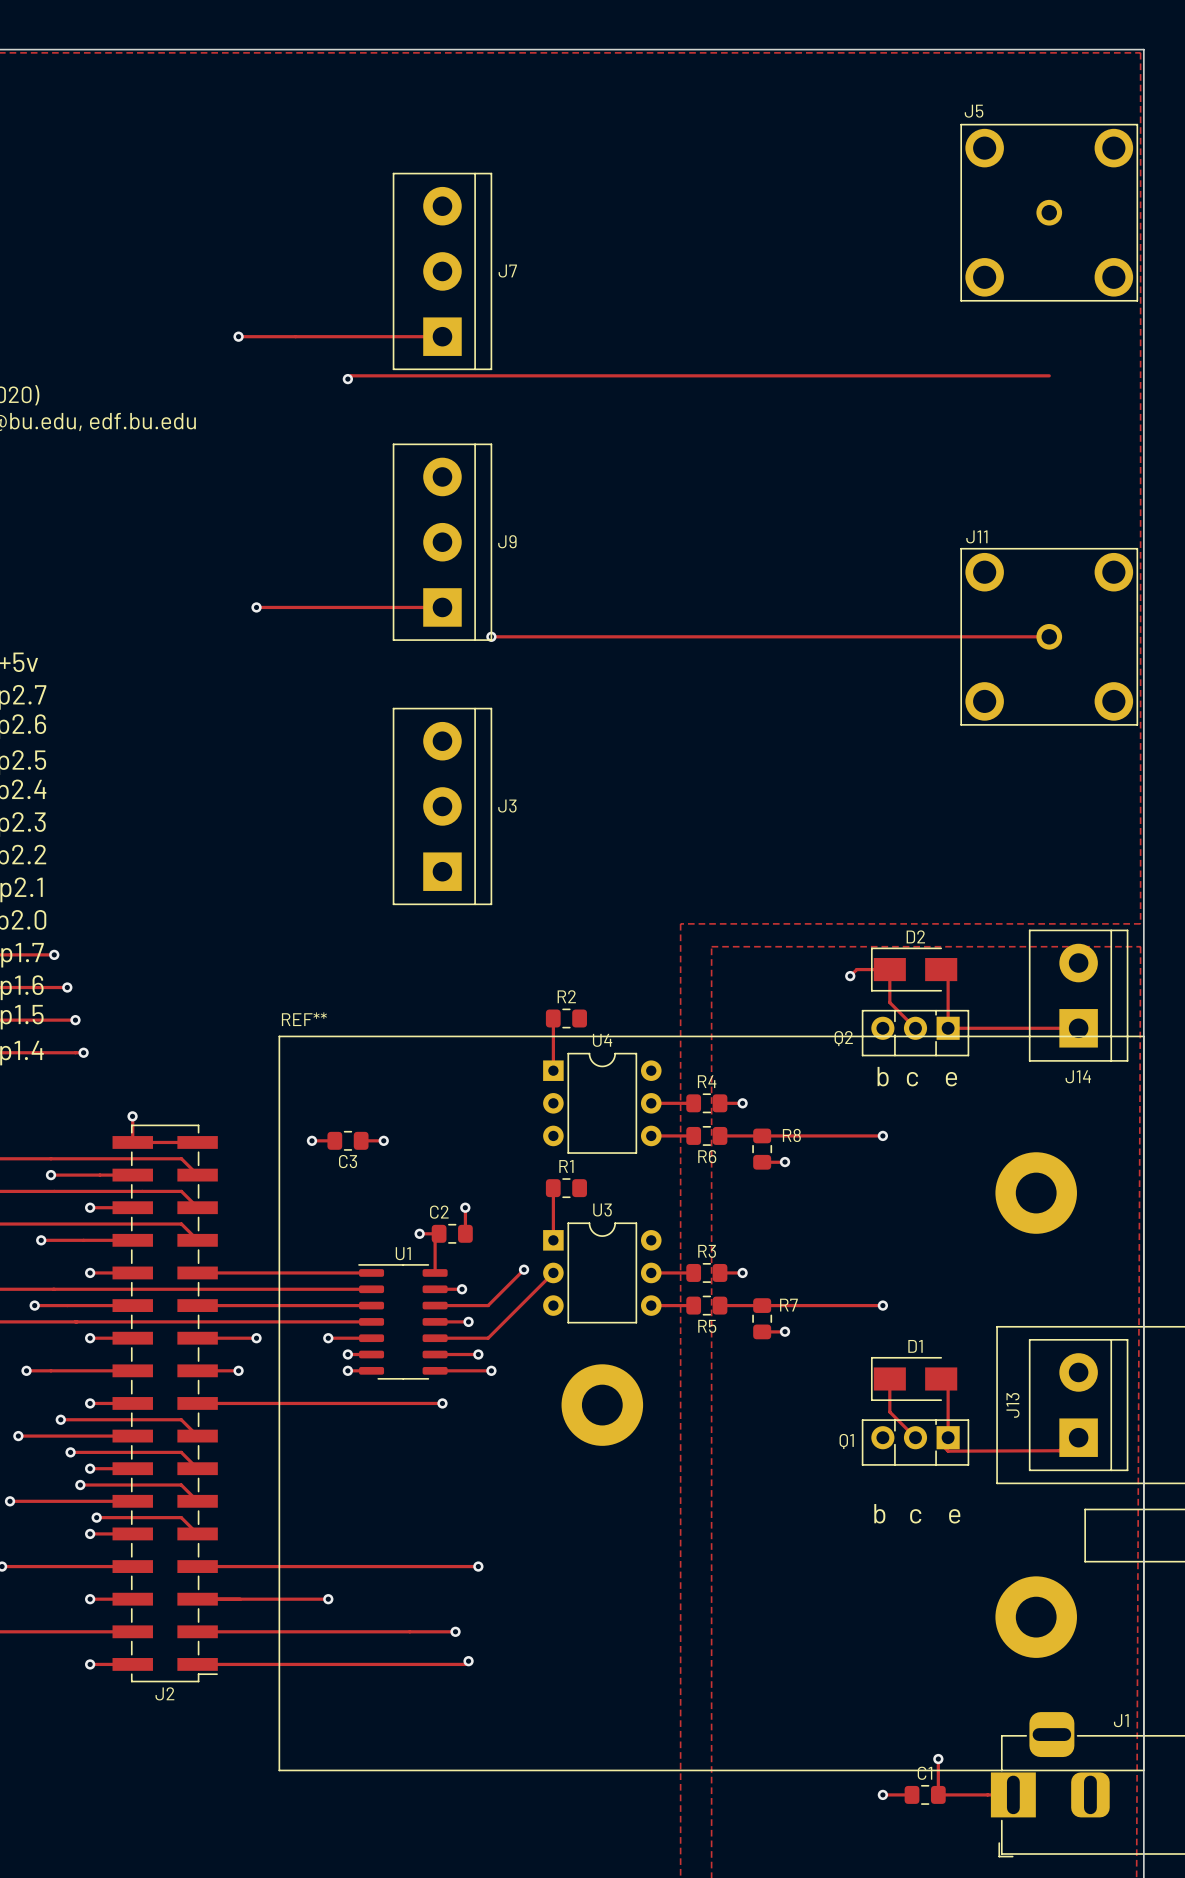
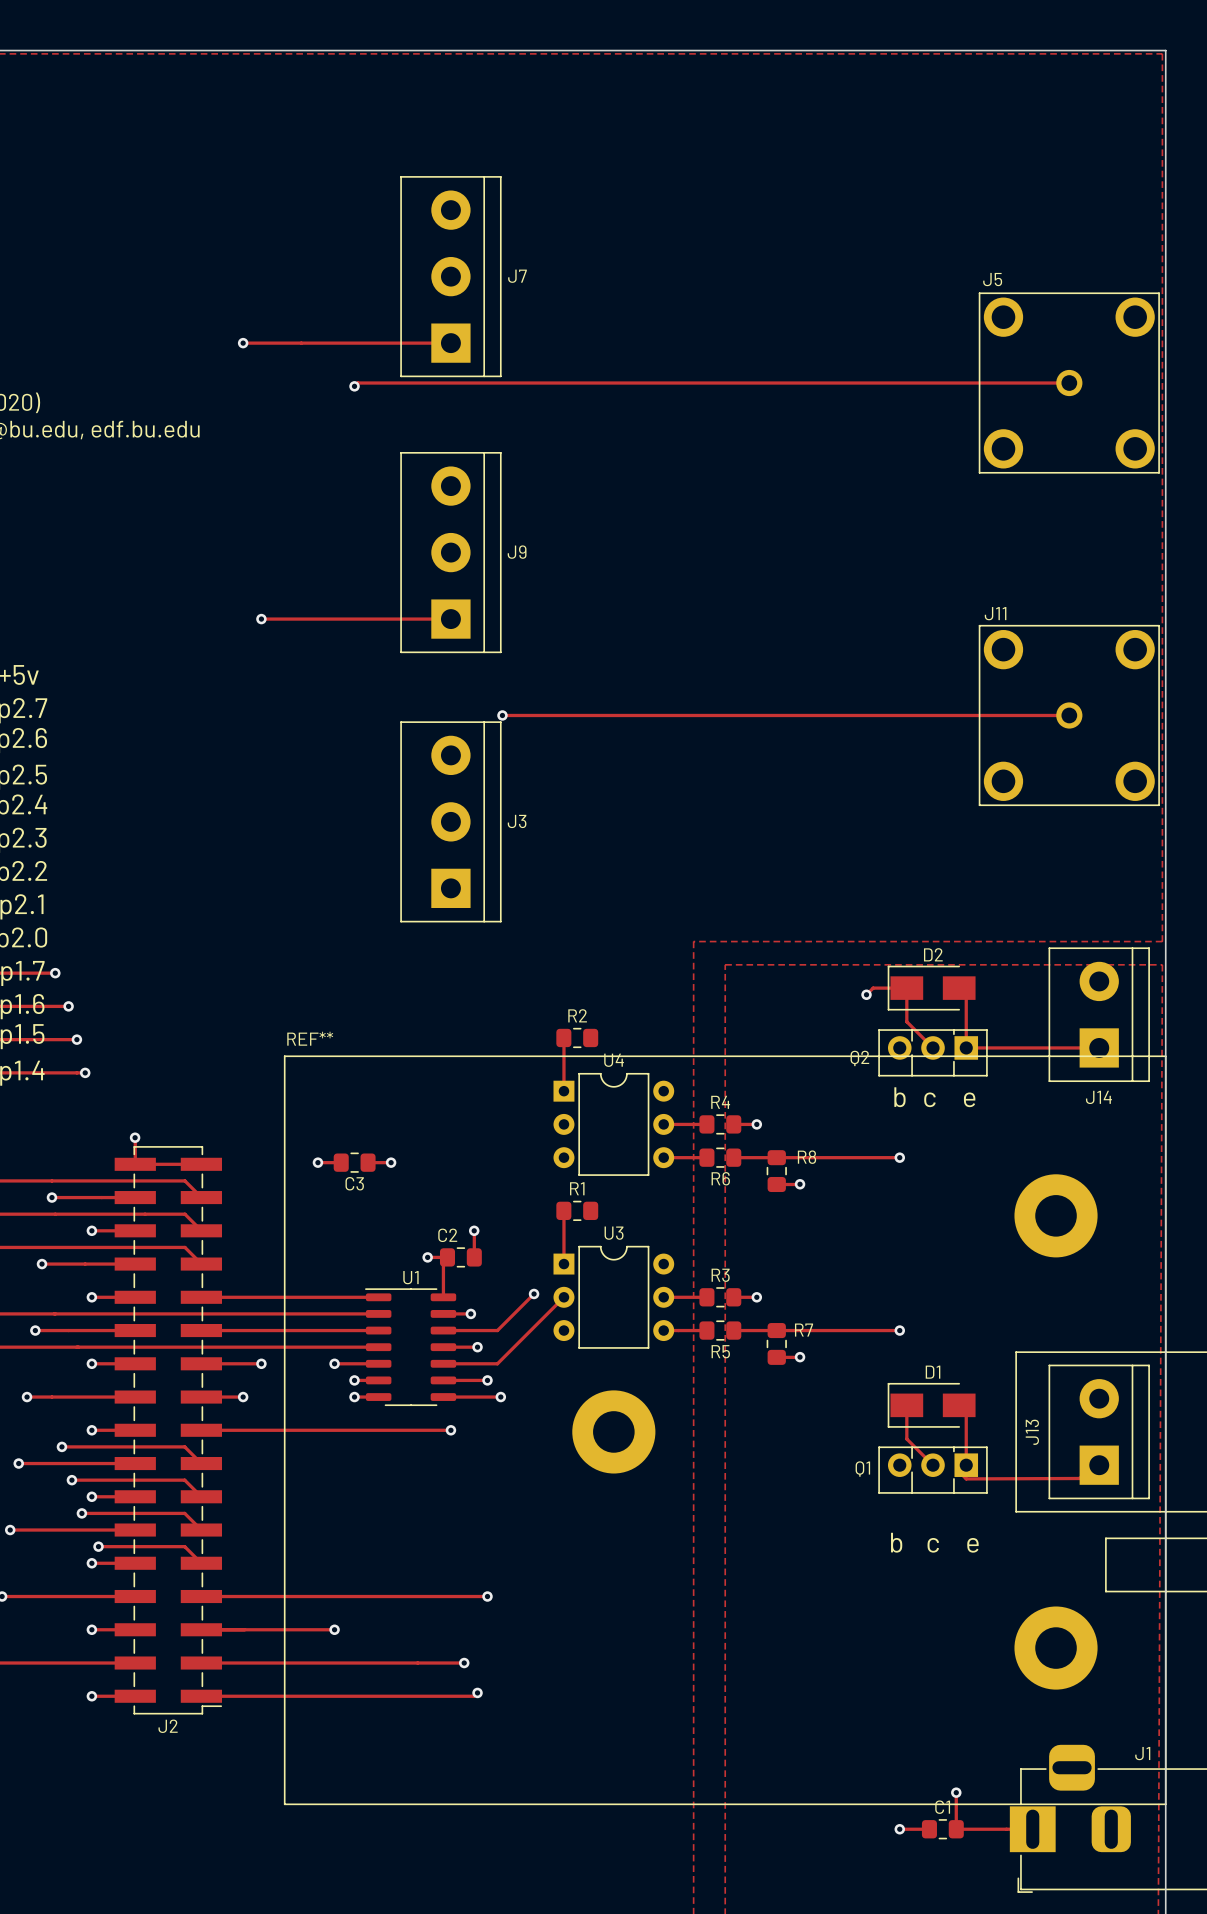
J5 position: (1049, 212) -> (1069, 383)
via position: (491, 636) -> (502, 715)
track: (493, 636) (1049, 636) -> none
J11 position: (1049, 636) -> (1069, 715)
track: none -> (502, 715) (1069, 715) (1067, 717)

